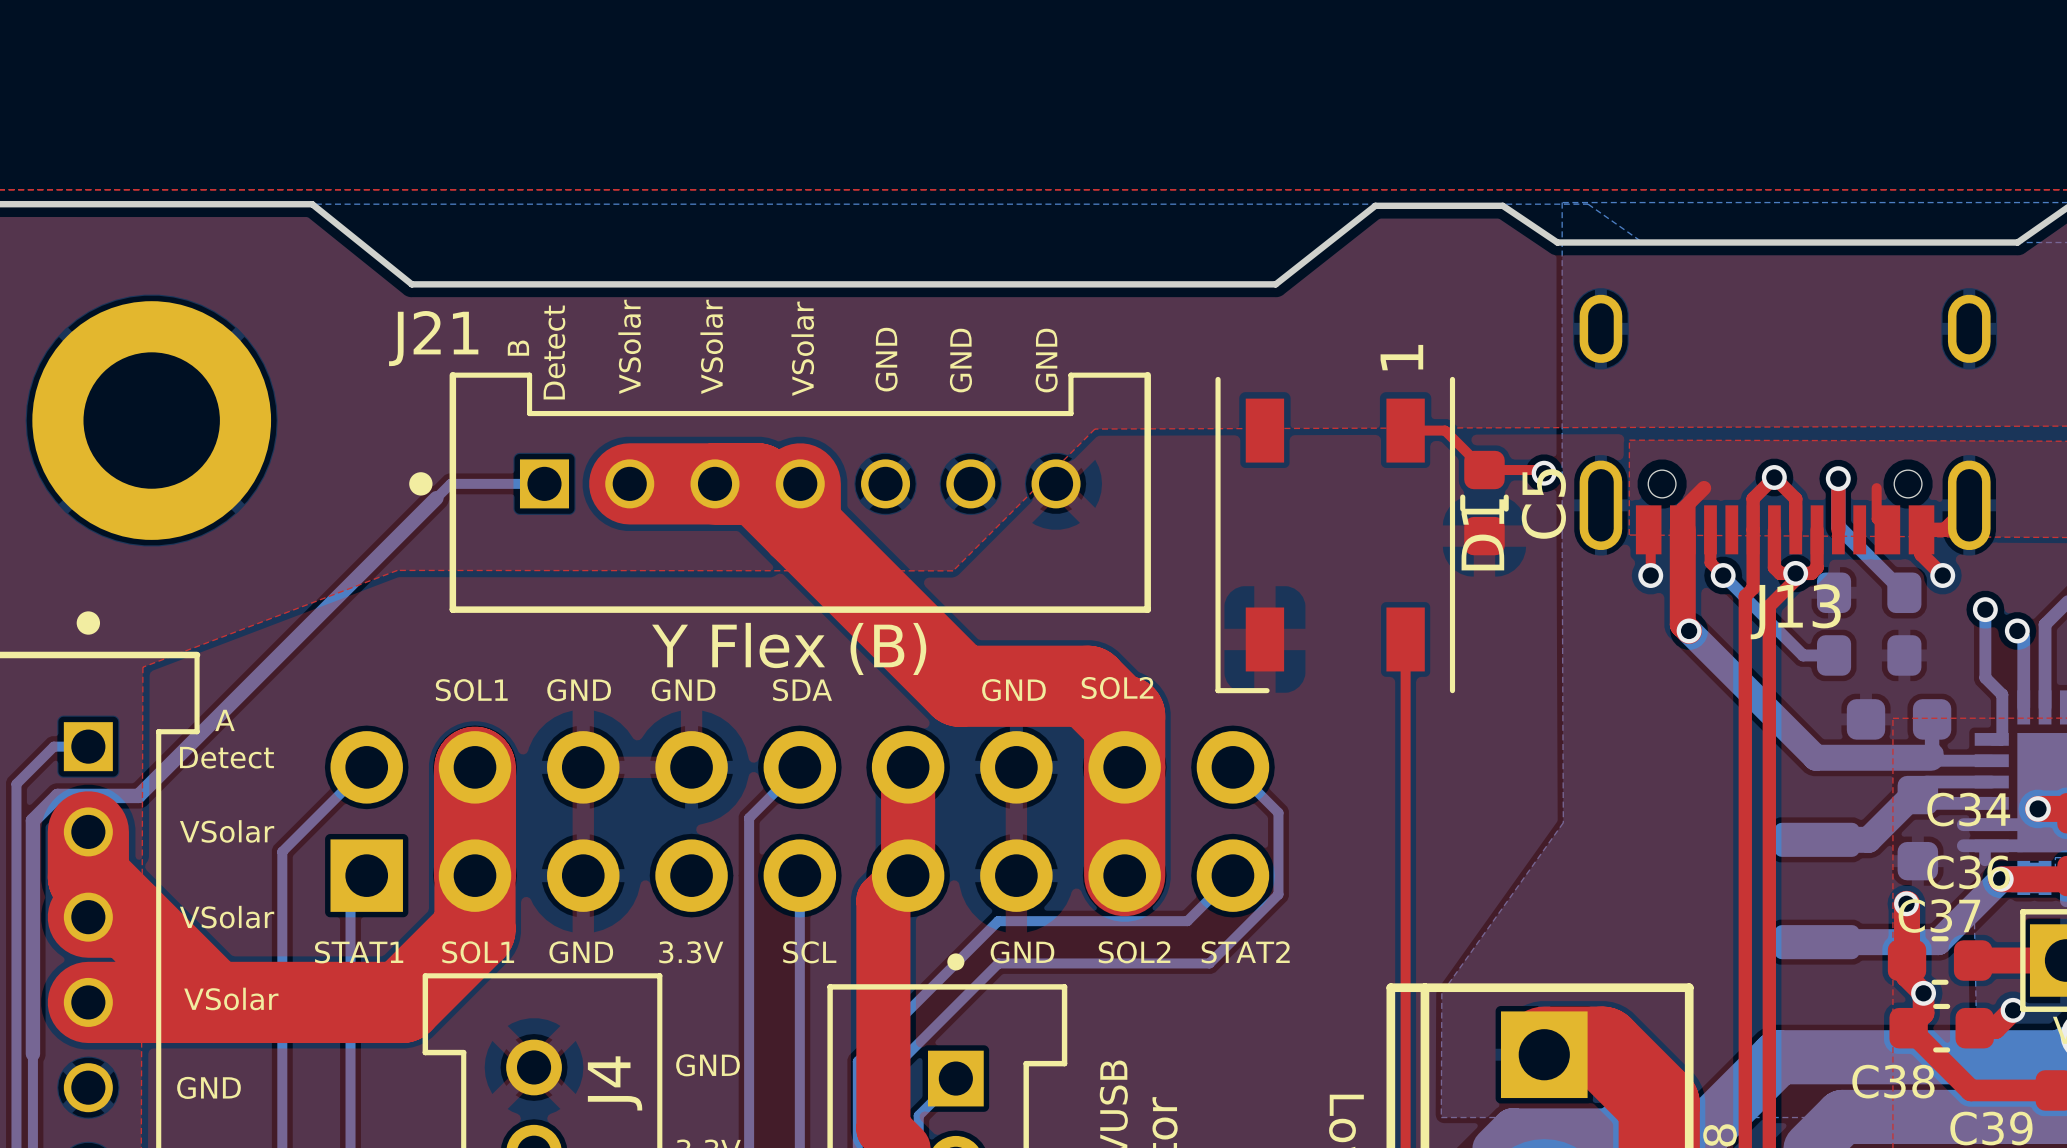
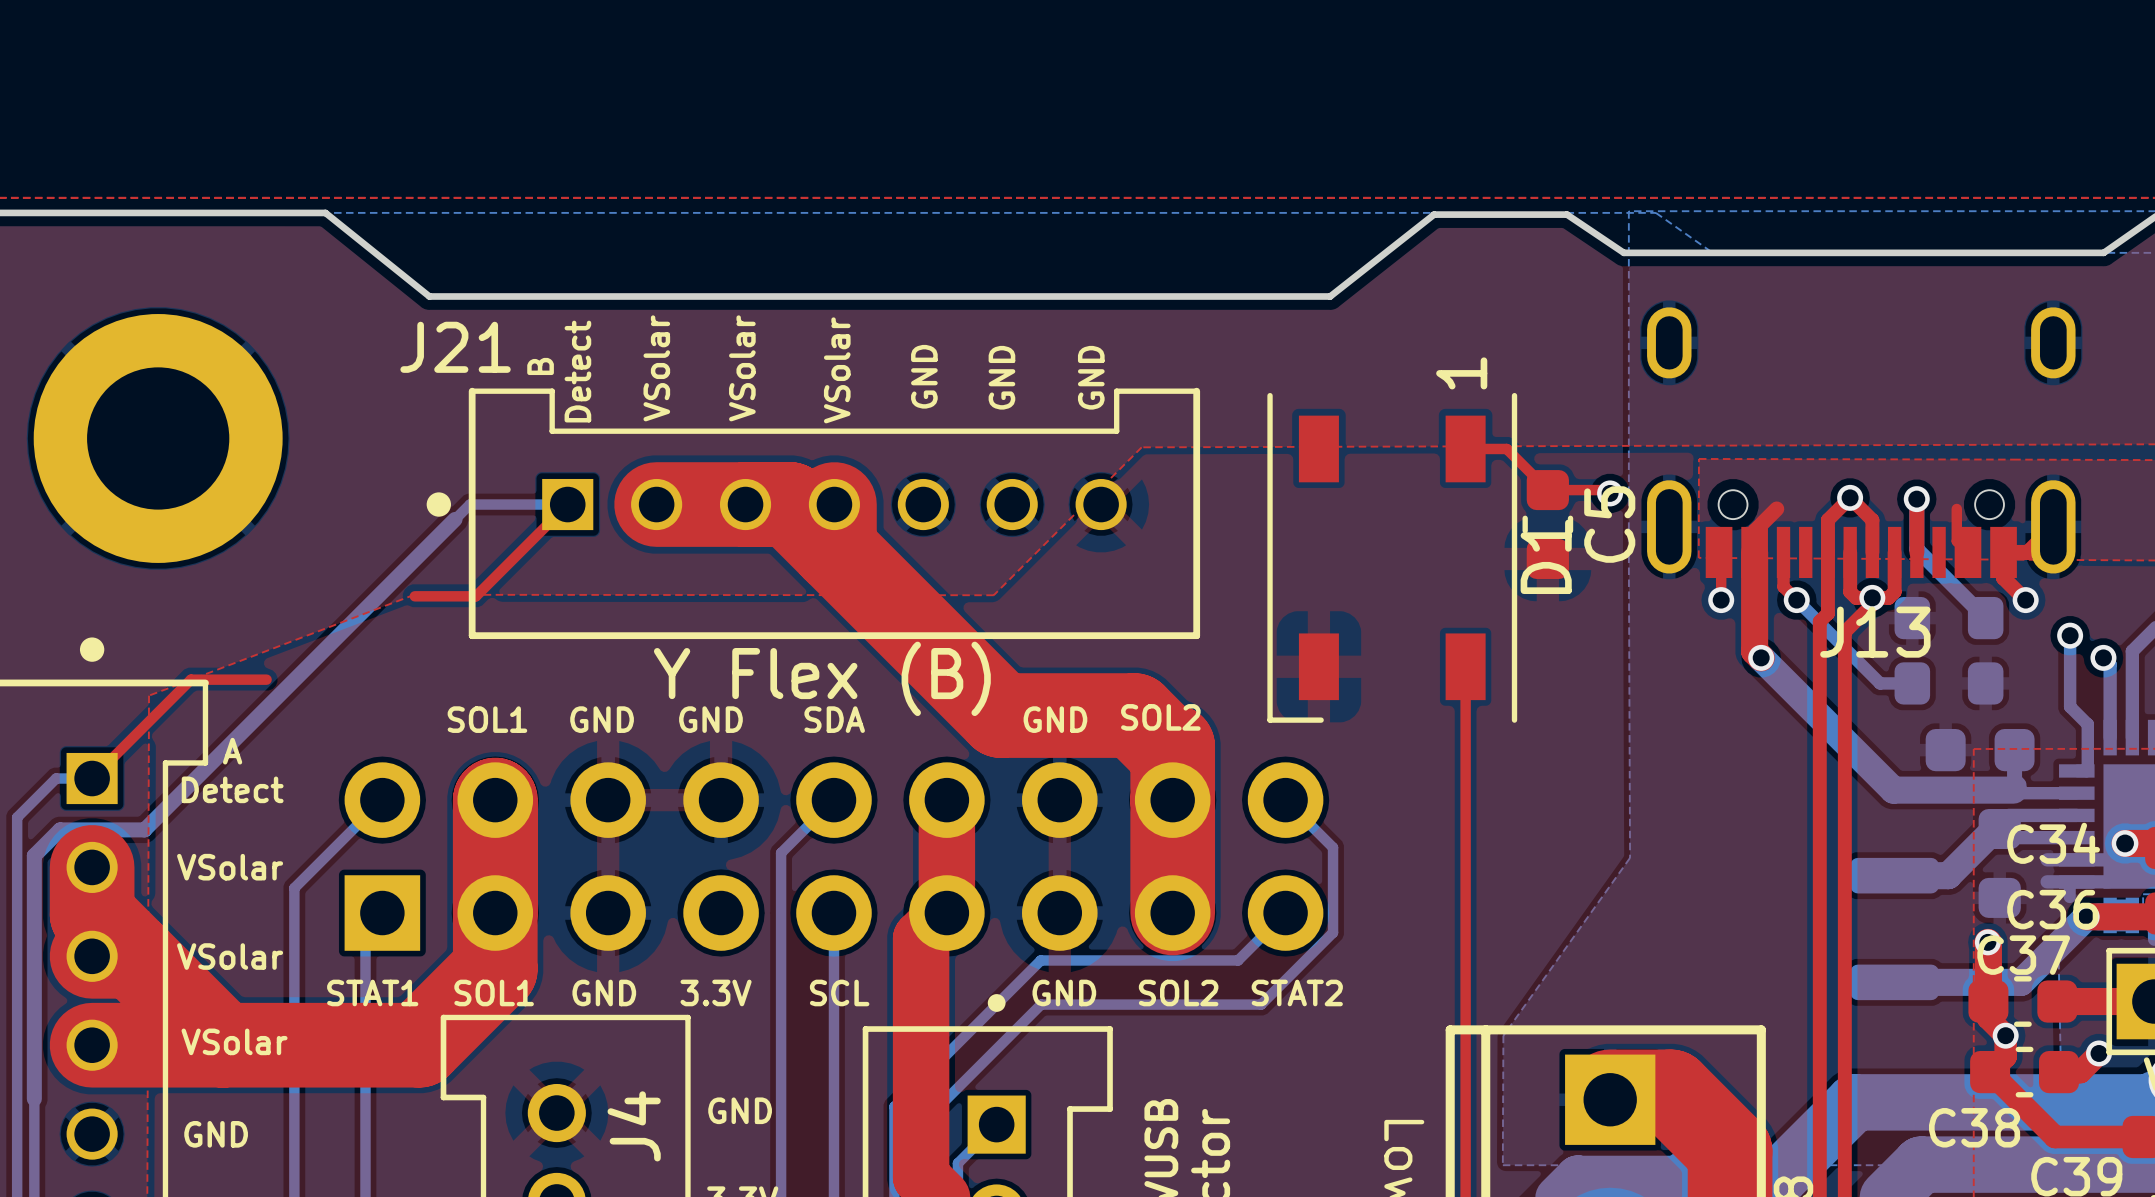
top track: none -> (567, 504) (475, 596) (414, 596)
top track: none -> (266, 679) (190, 679) (92, 778)

